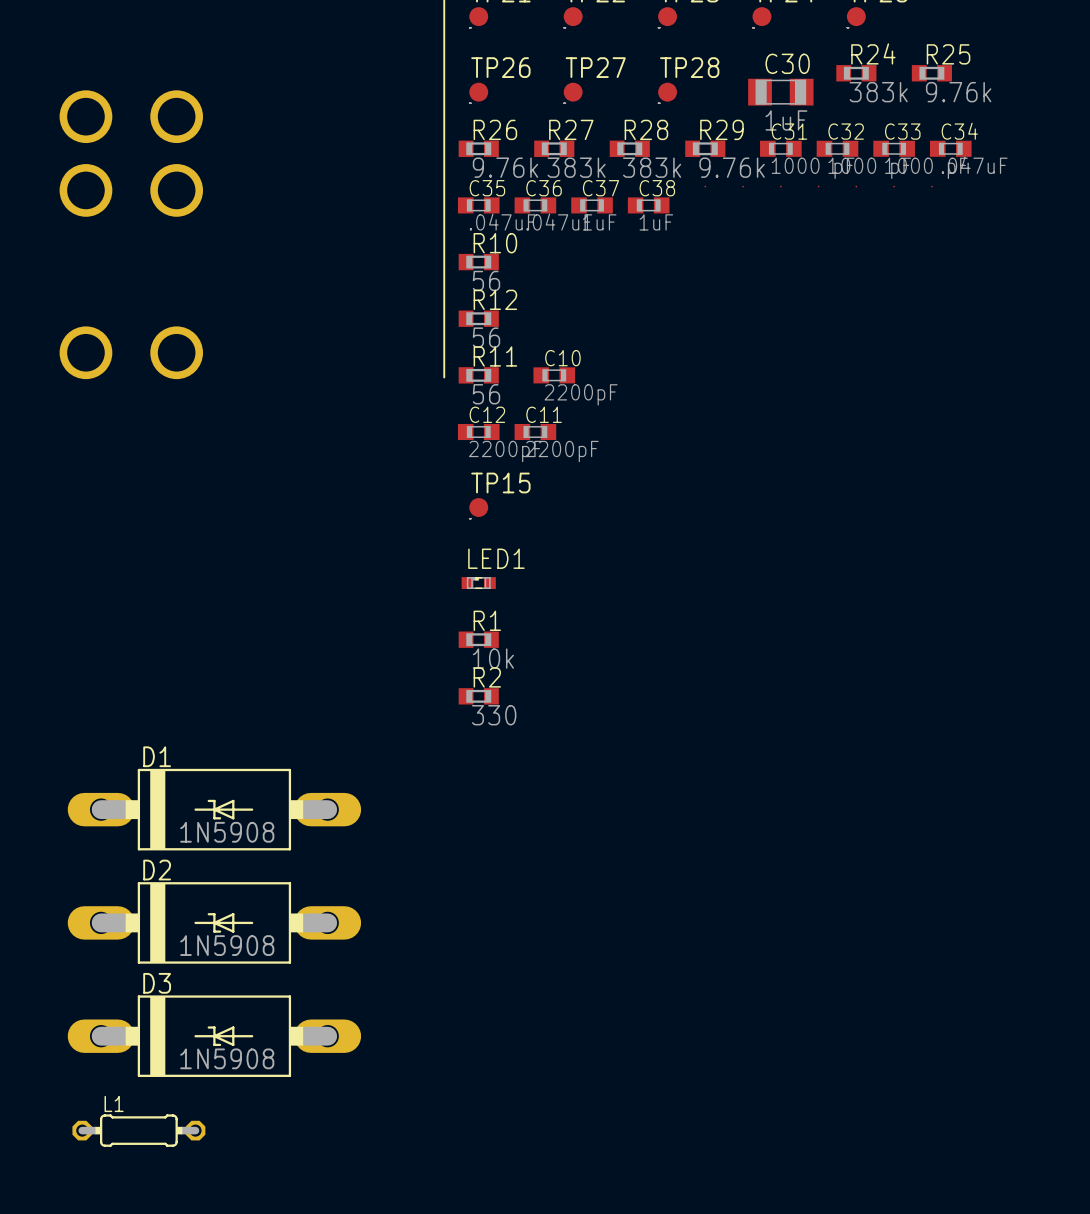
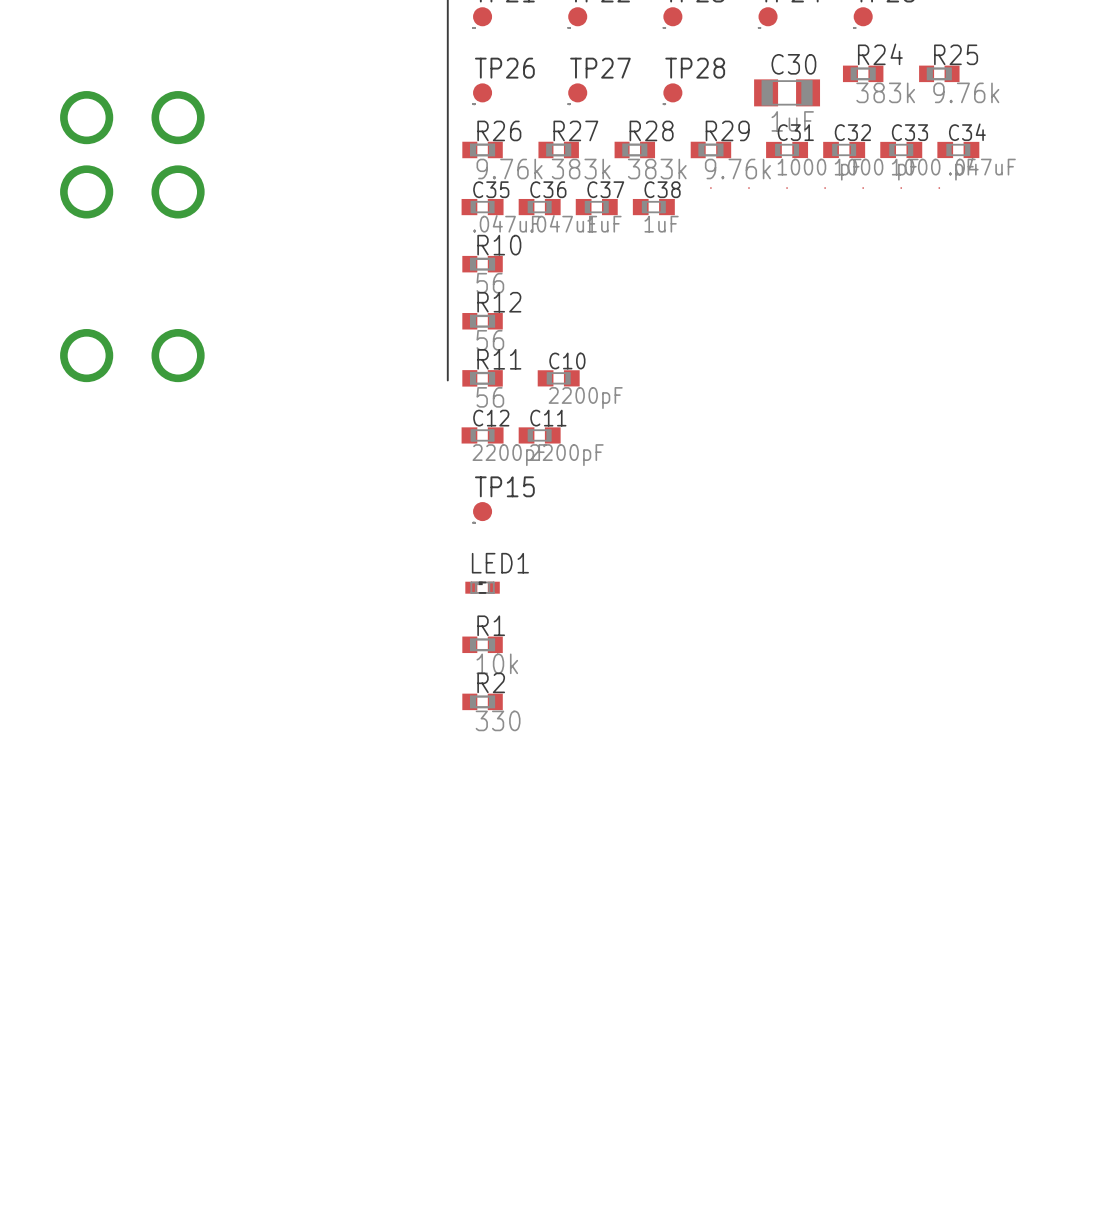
D1: 1N5908 (214, 809) -> none
D2: 1N5908 (214, 922) -> none
D3: 1N5908 (214, 1036) -> none
L1: (138, 1130) -> none

